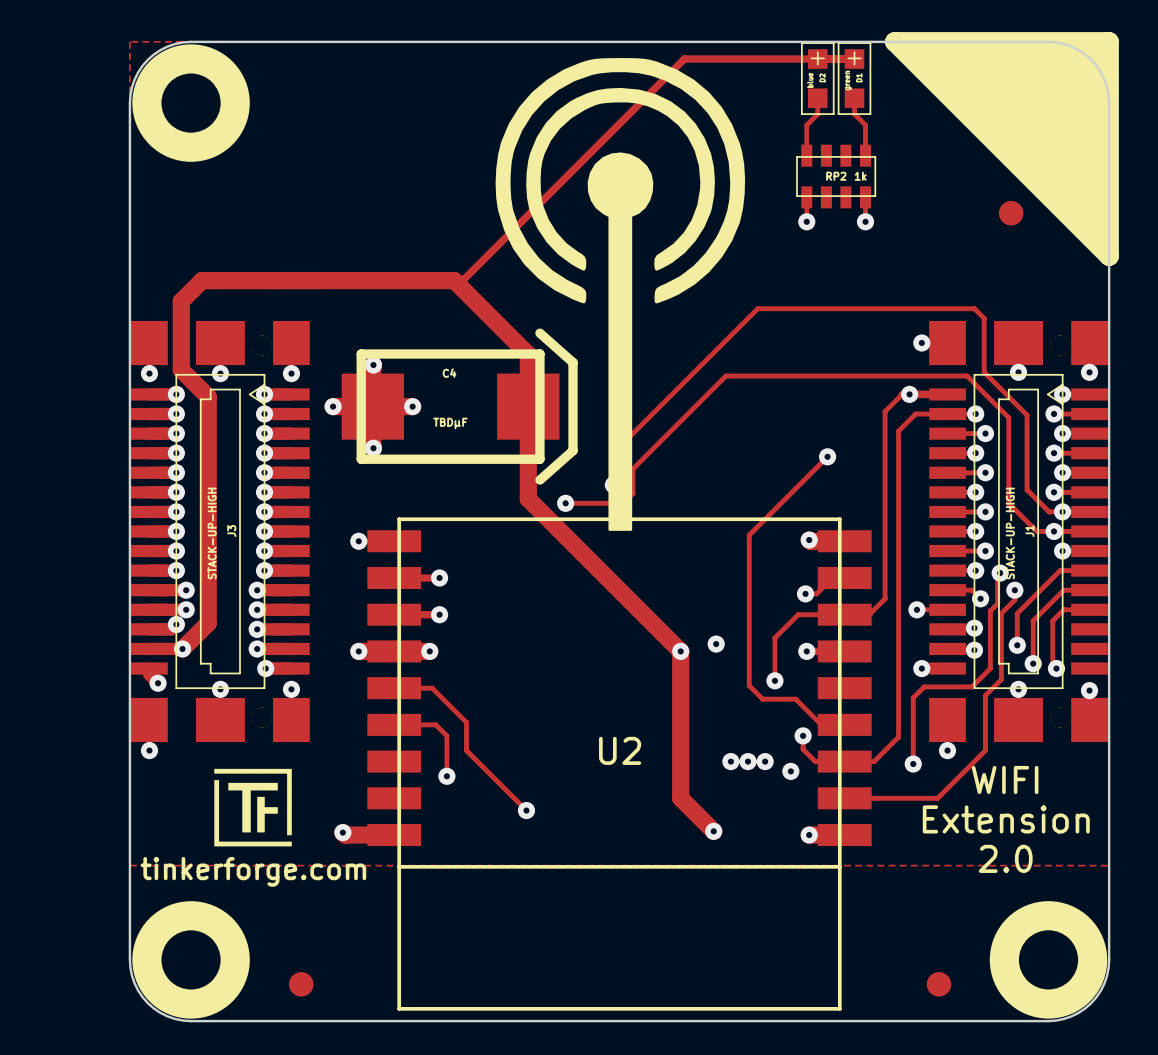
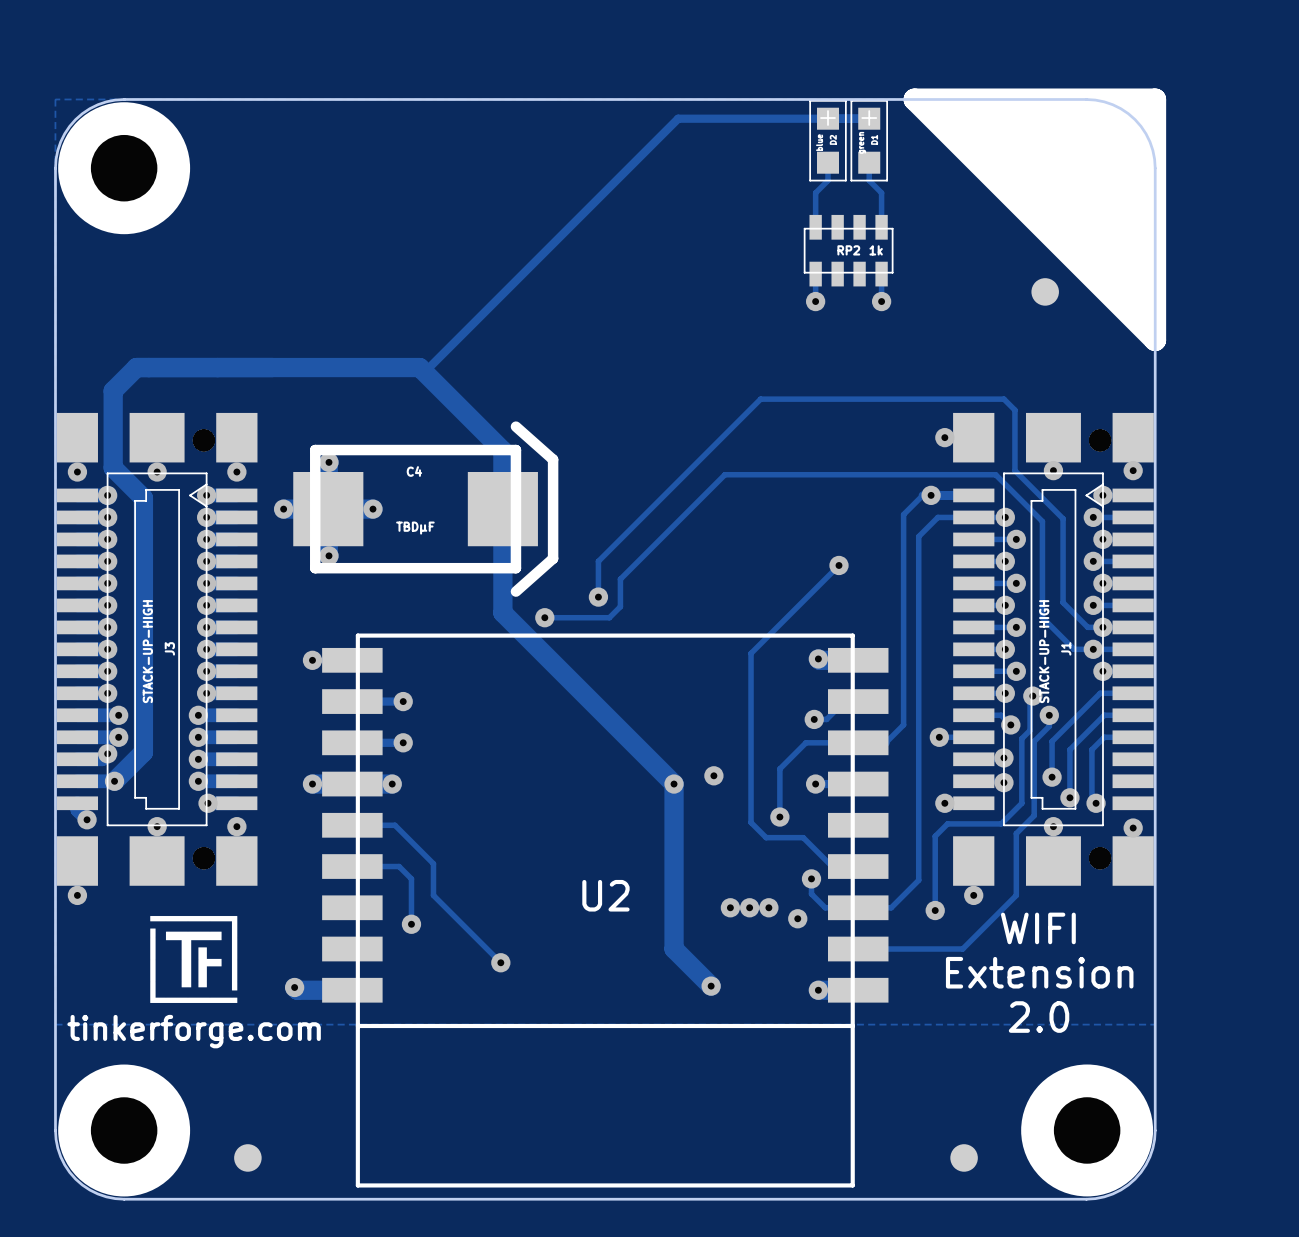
drawing: [495, 58, 746, 531] -> none

